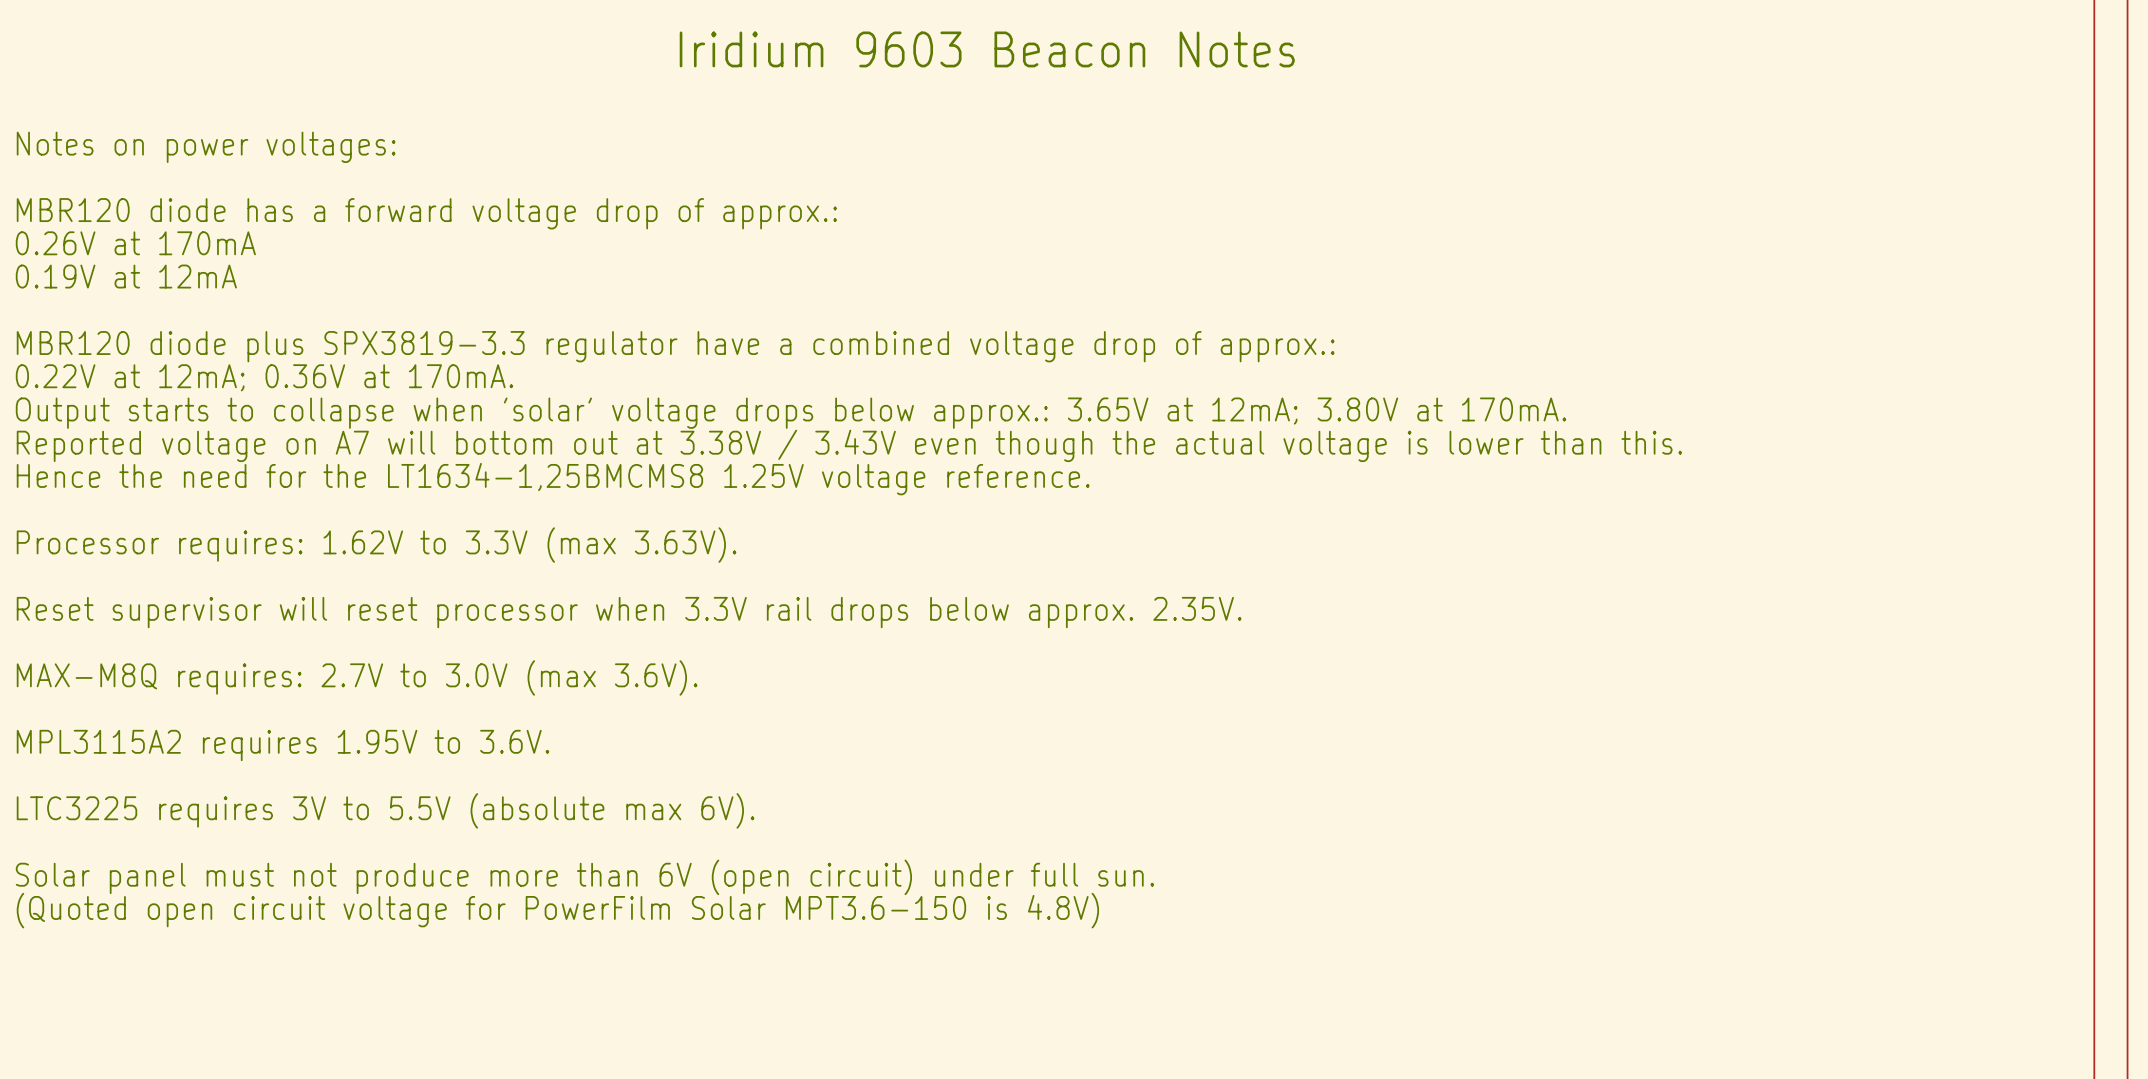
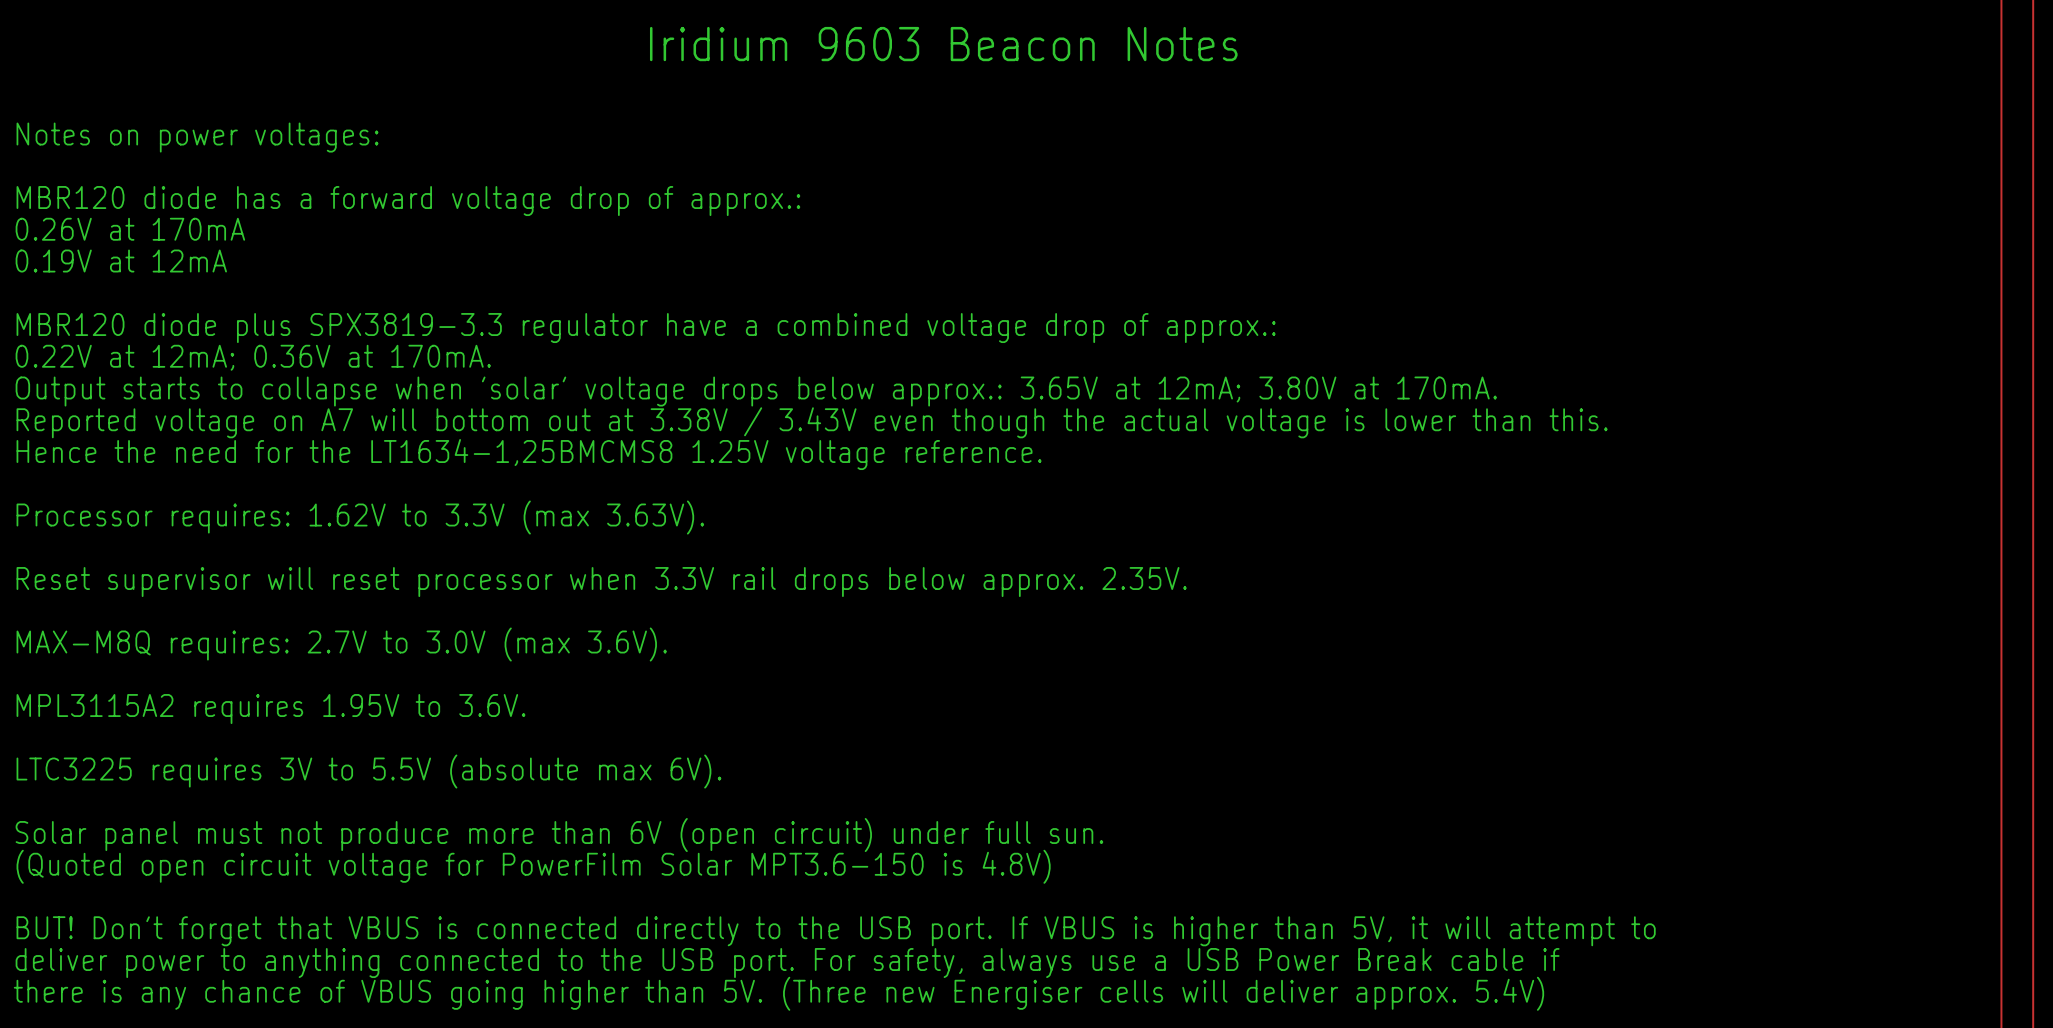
text: none -> BUT! Don't forget that VBUS is connected directly to the USB port. If VBUS is higher than 5V, it will attempt to (836, 931)
text: none -> deliver power to anything connected to the USB port. For safety, always use a USB Power Break cable if (787, 963)
text: none -> there is any chance of VBUS going higher than 5V. (Three new Energiser cells will deliver approx. 5.4V) (778, 993)

